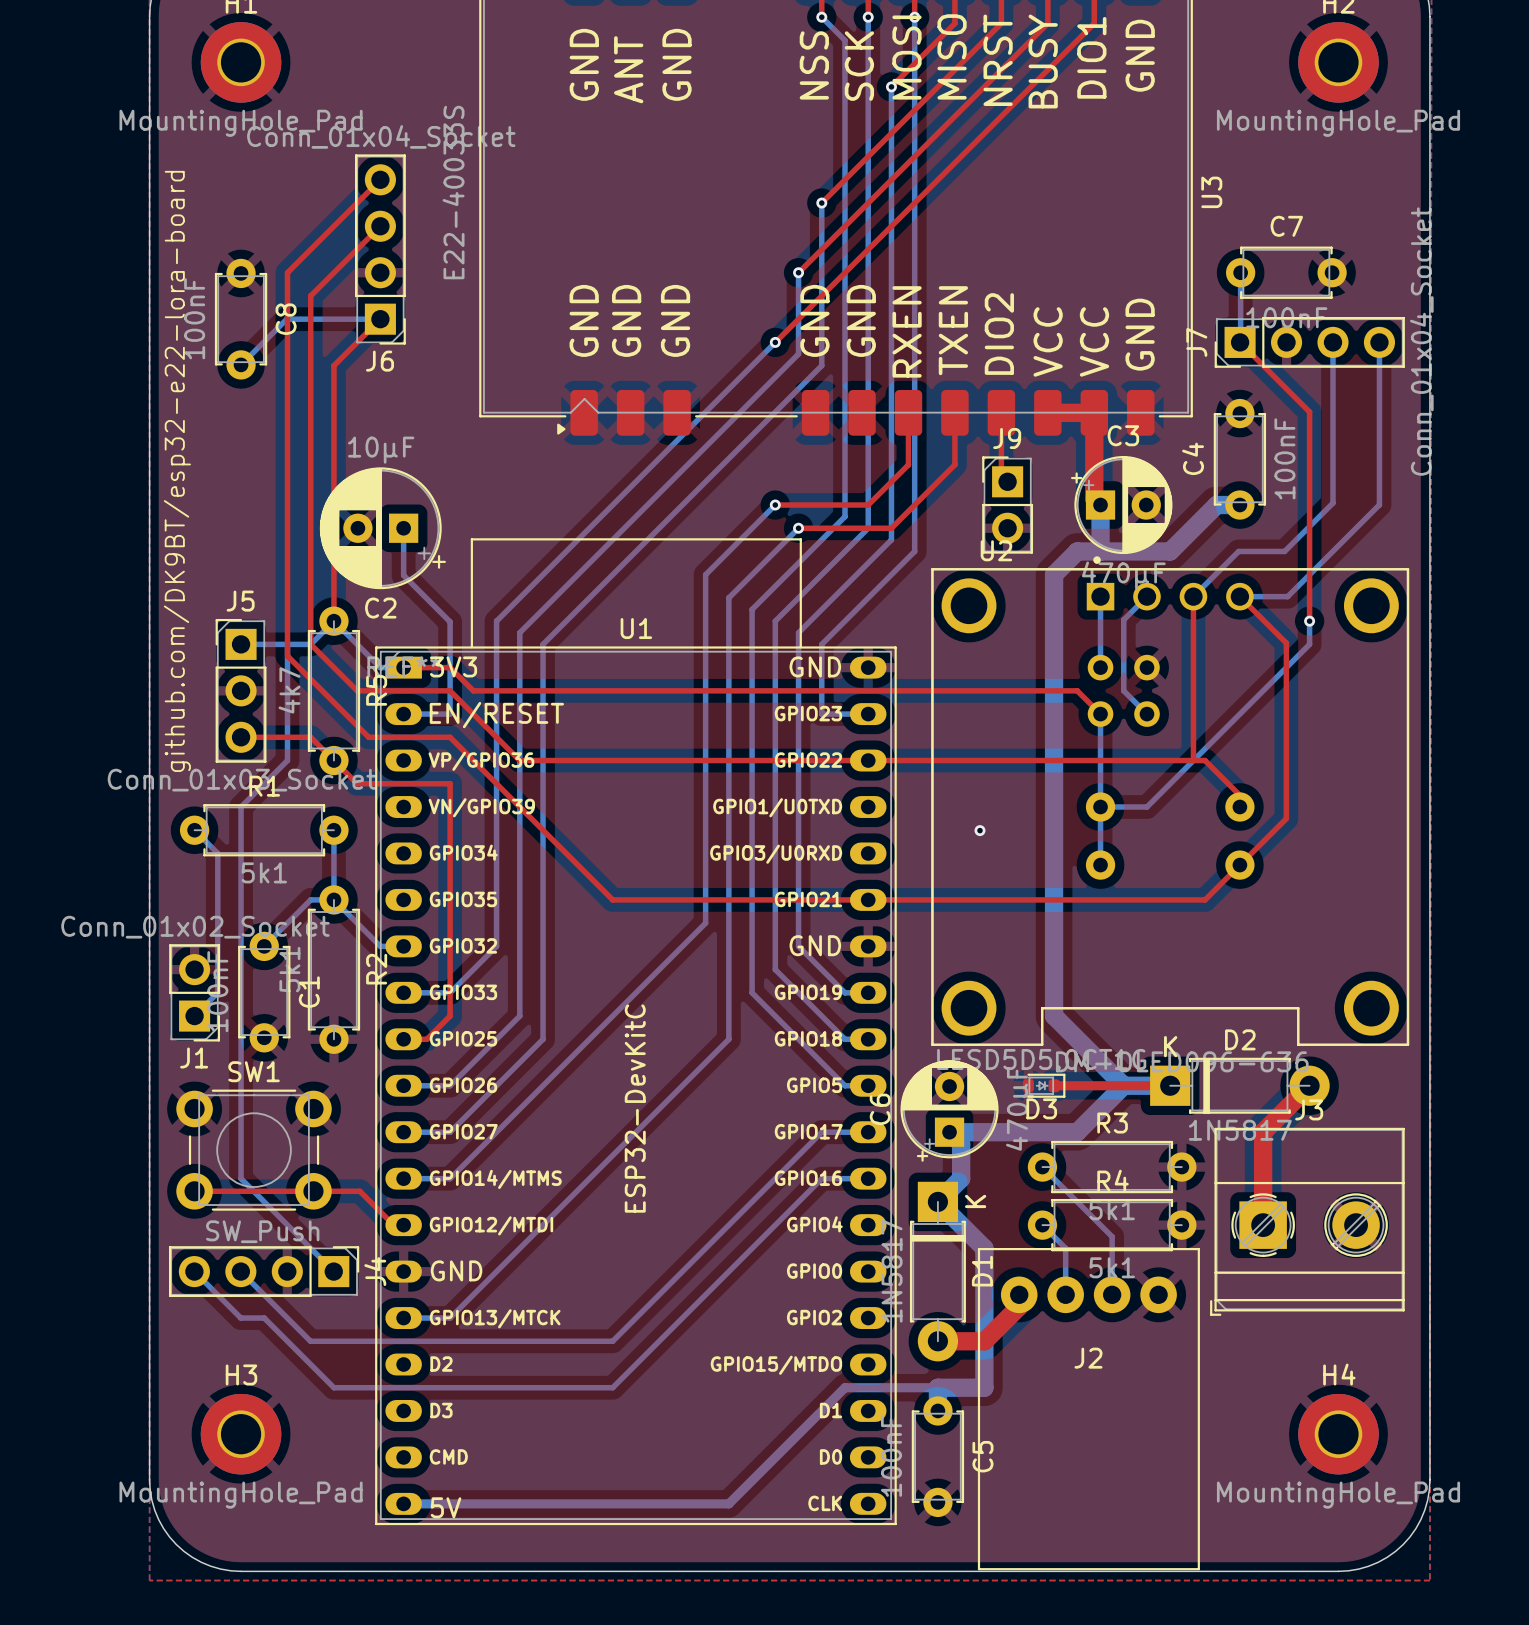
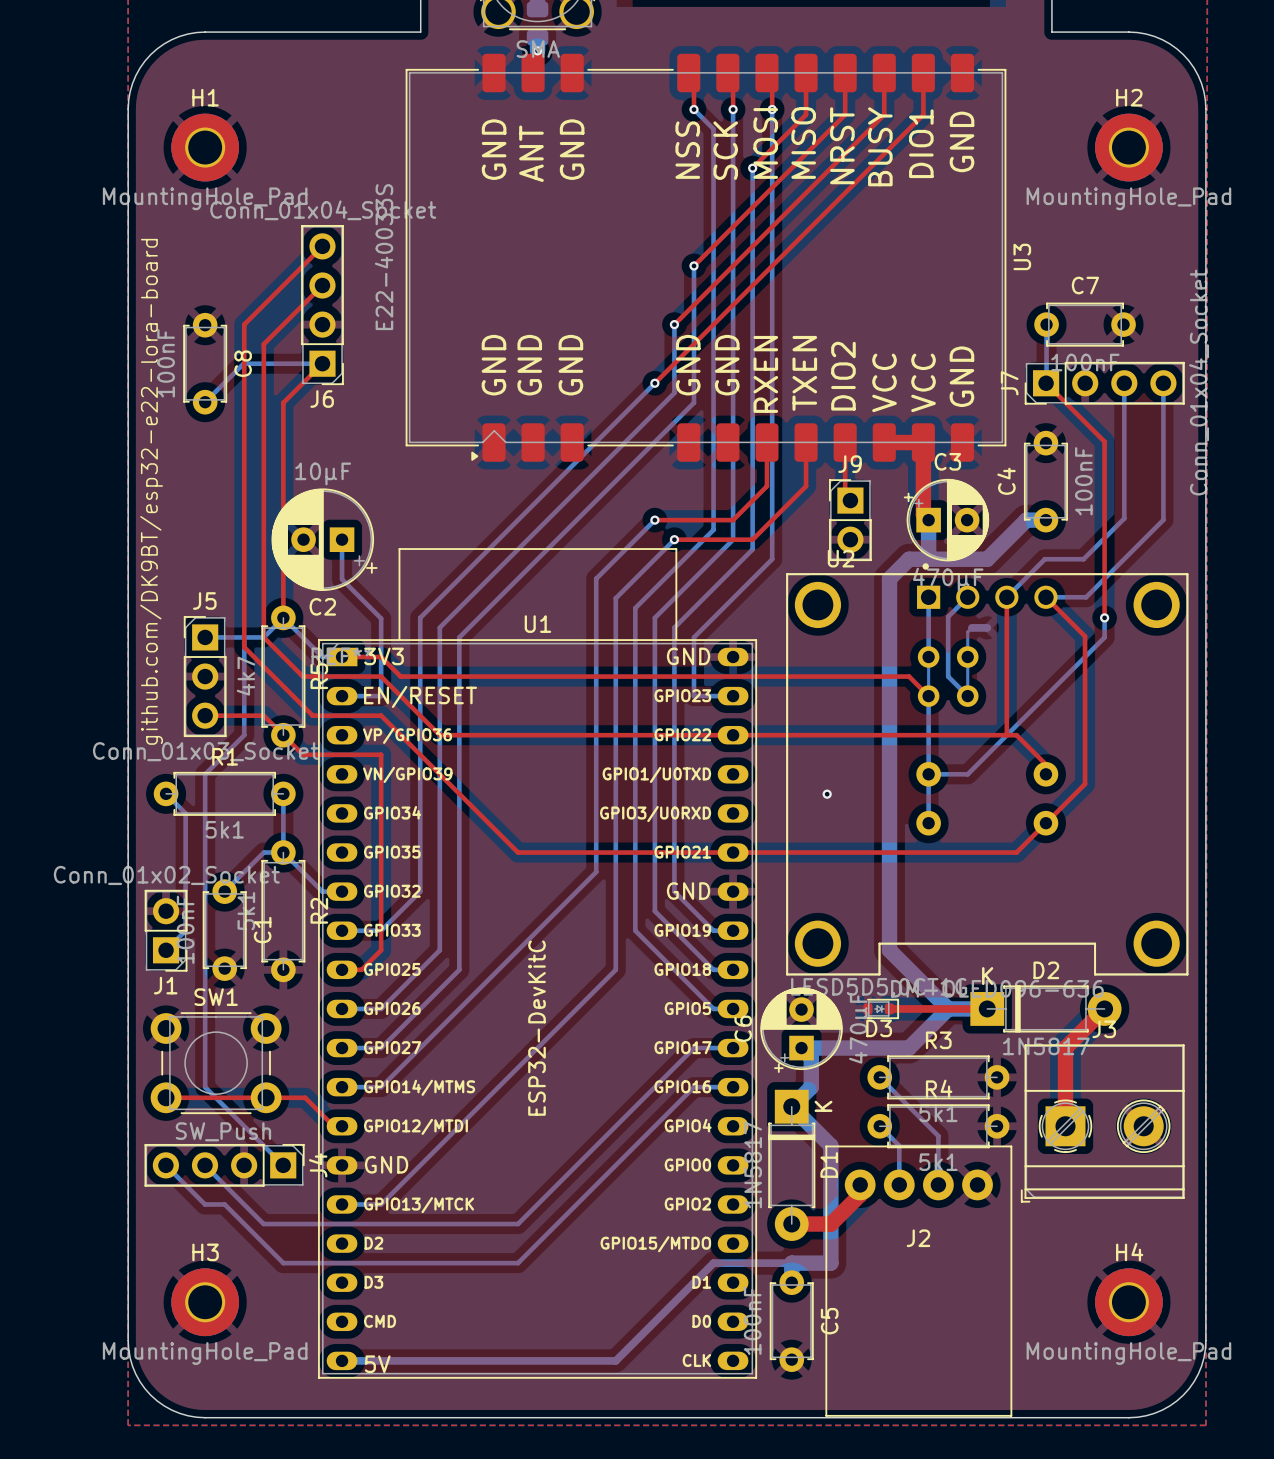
bottom track: none -> (971, 627) (967, 632) (967, 696)
part: none -> (979, 627)
bottom track: none -> (928, 657) (928, 696)

